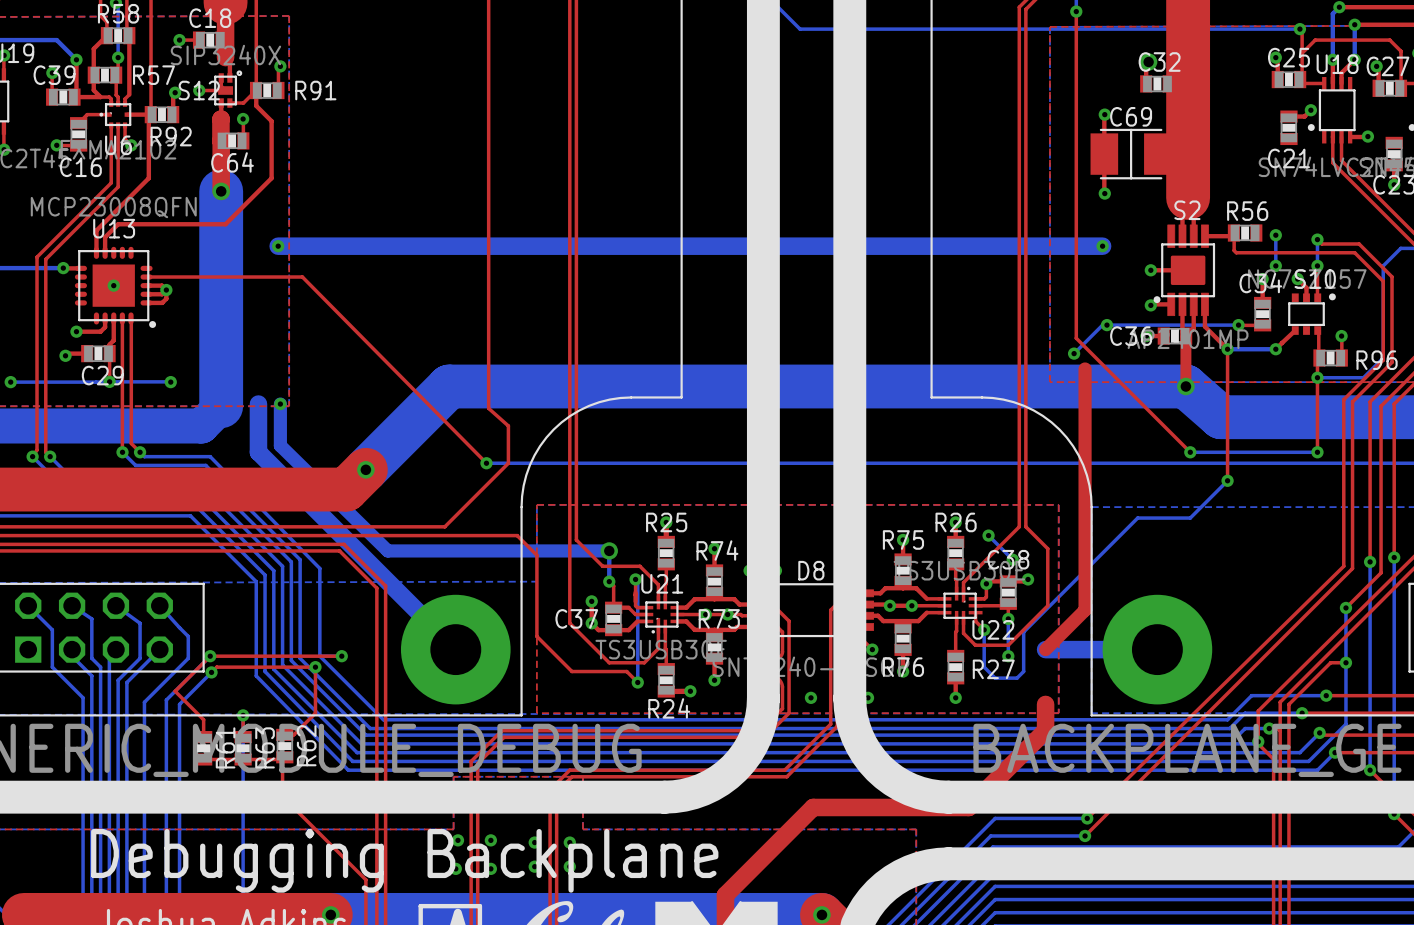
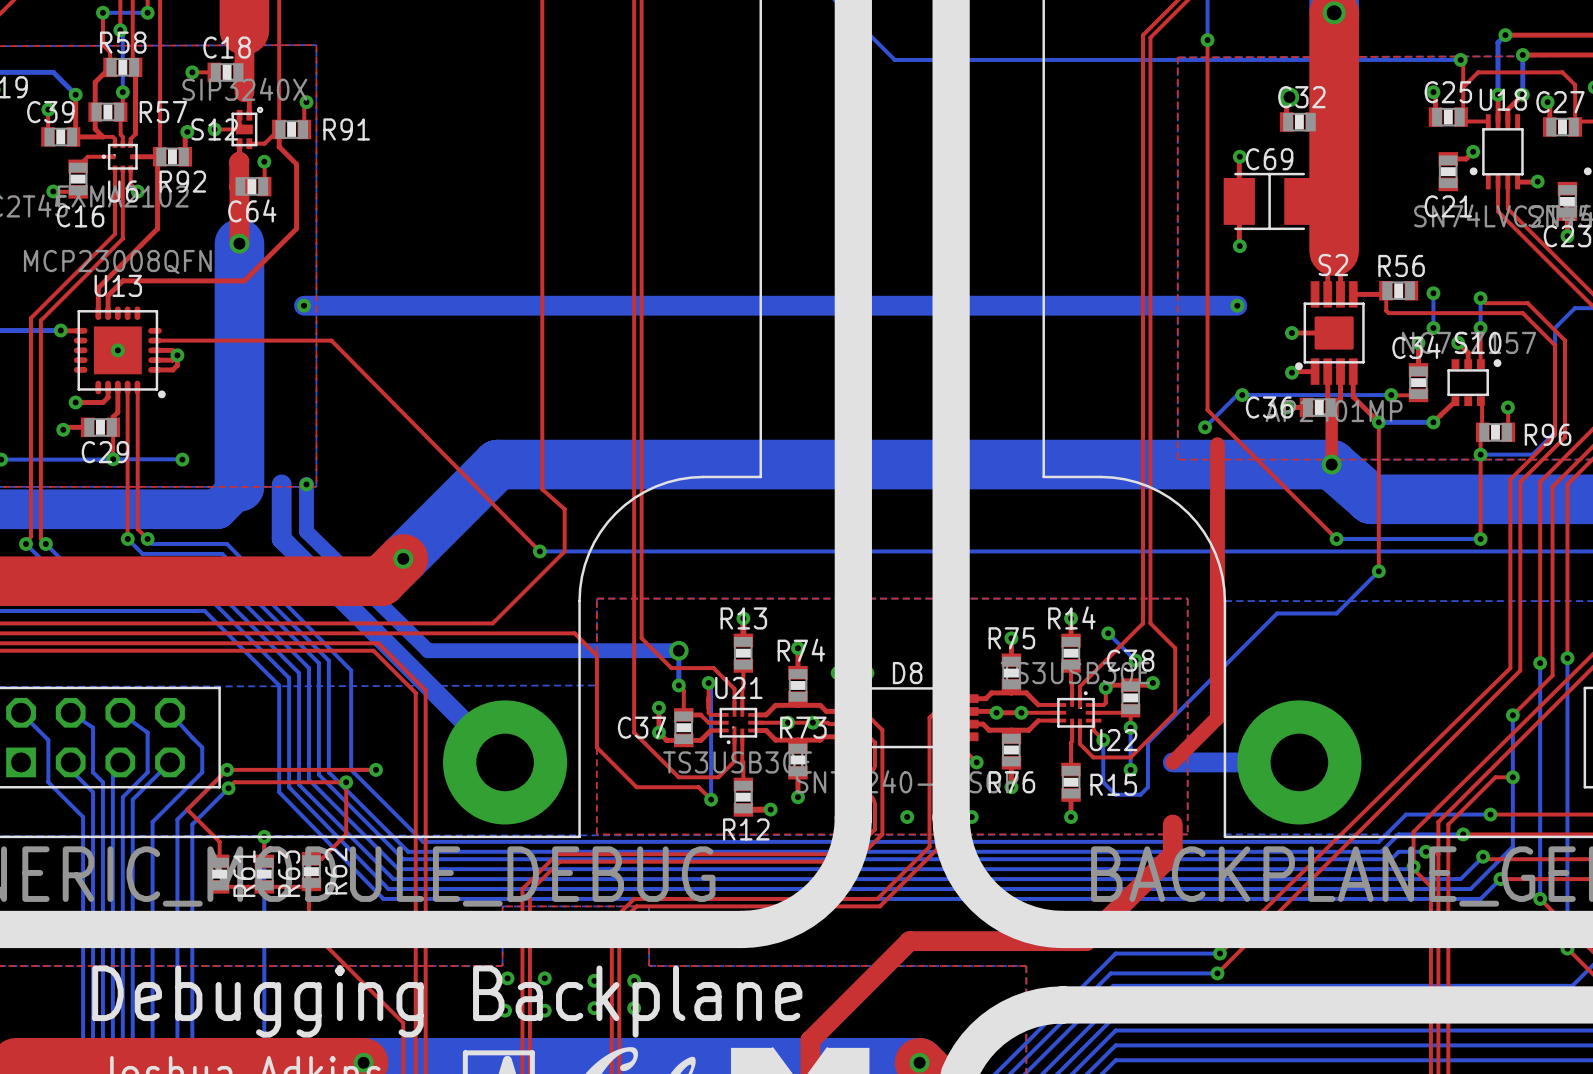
R25 name: R25 (666, 522) -> R13 (743, 618)
R26 name: R26 (956, 522) -> R14 (1071, 617)
R27 name: R27 (993, 669) -> R15 (1113, 784)
R24 name: R24 (669, 708) -> R12 (746, 829)

